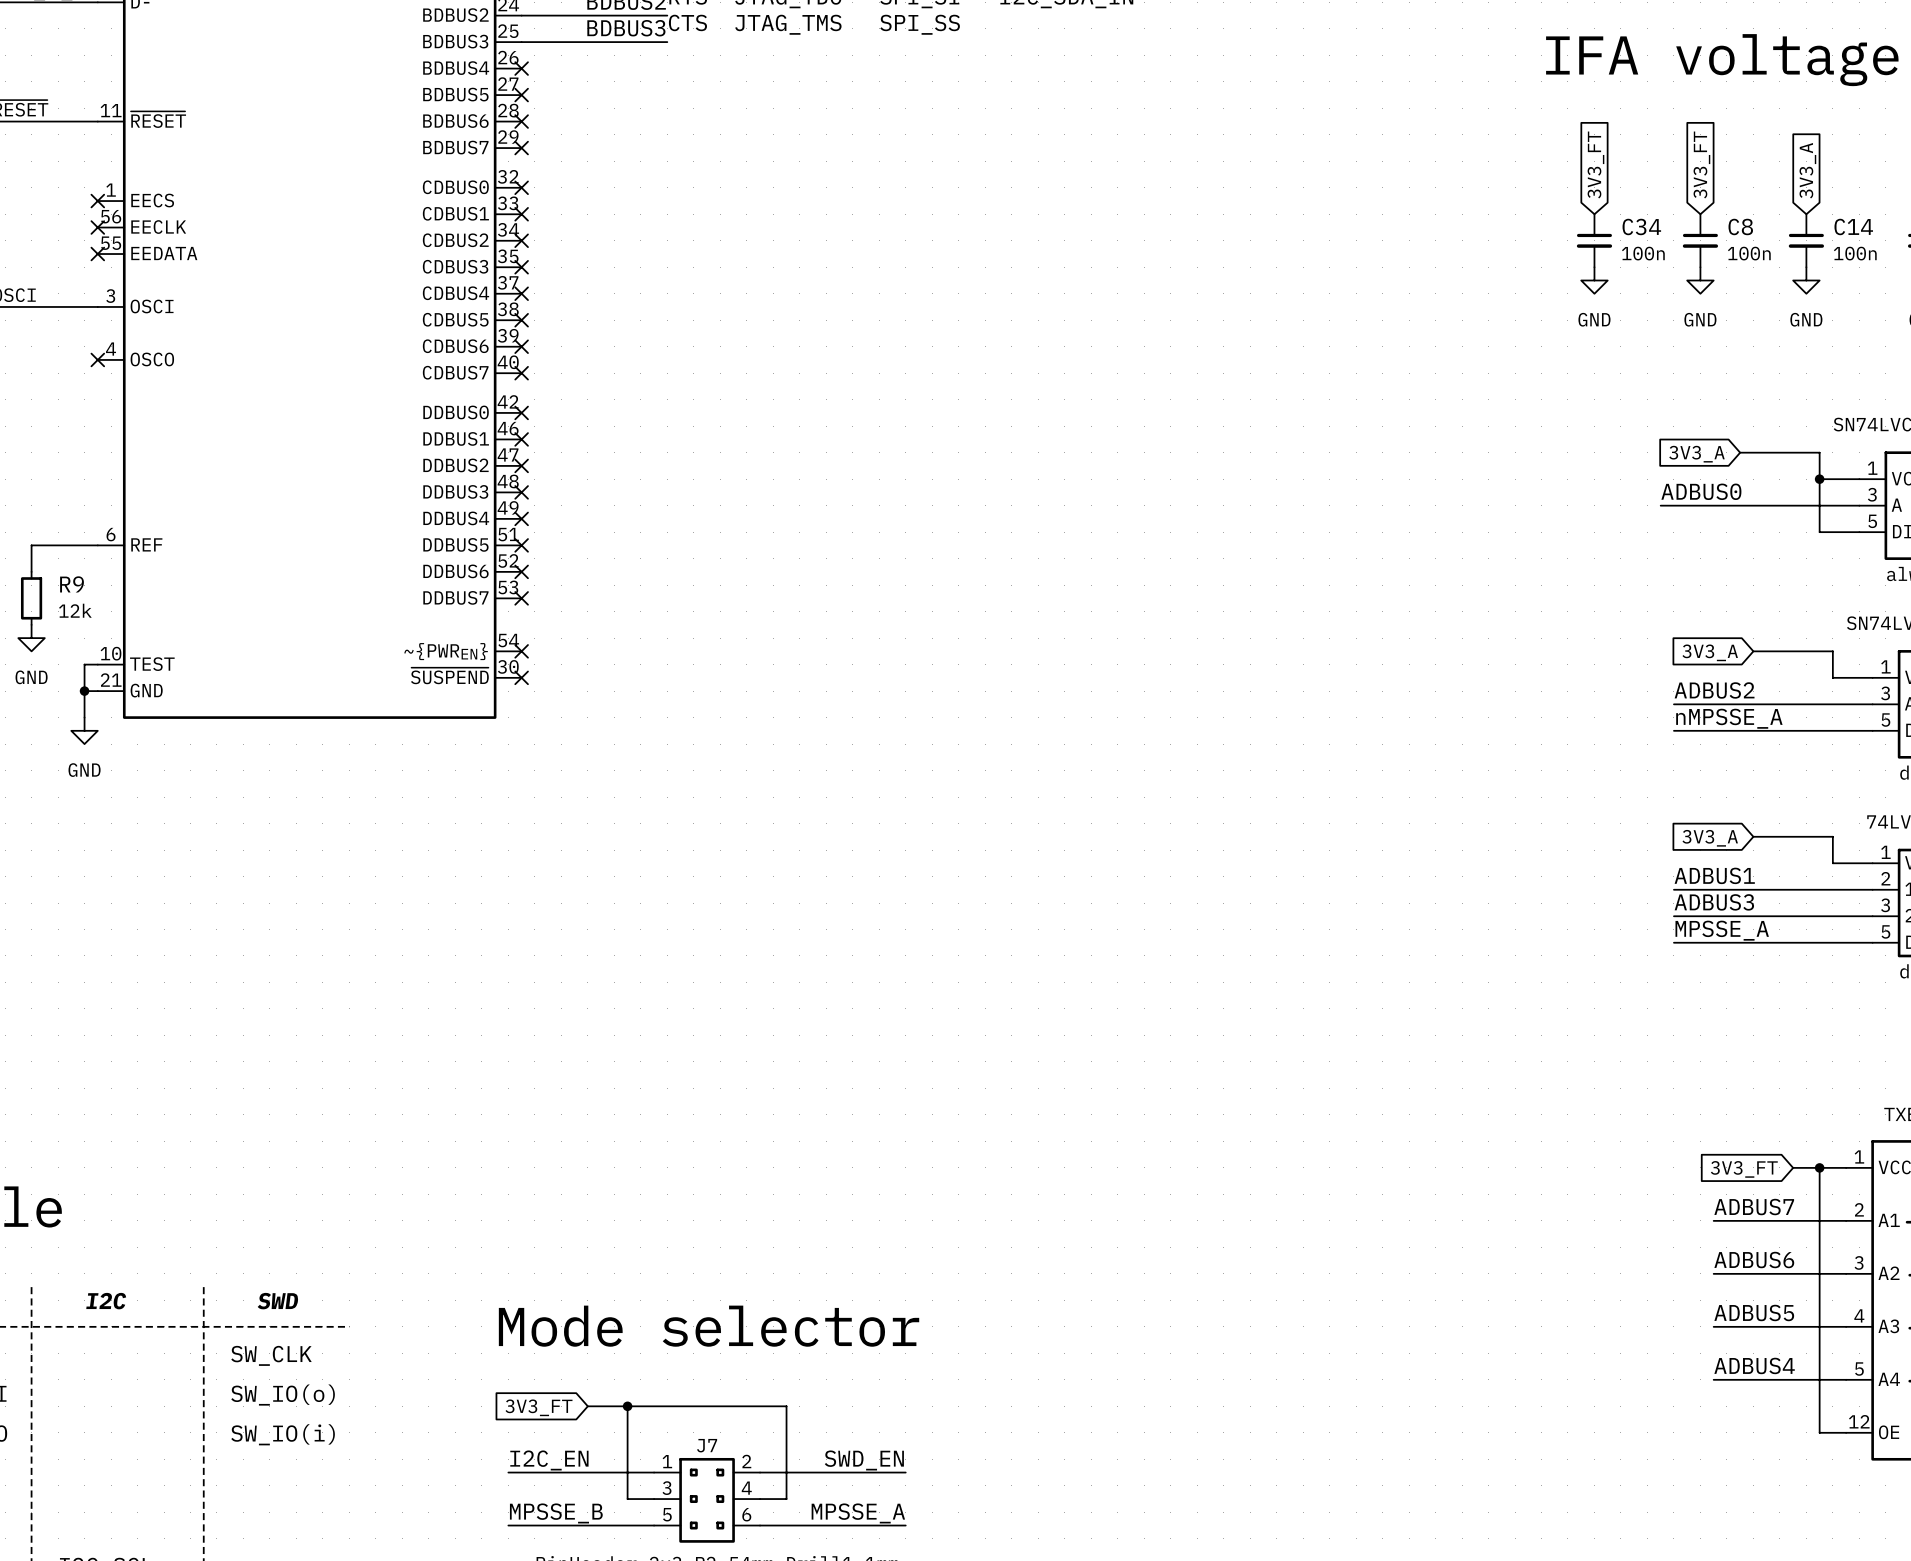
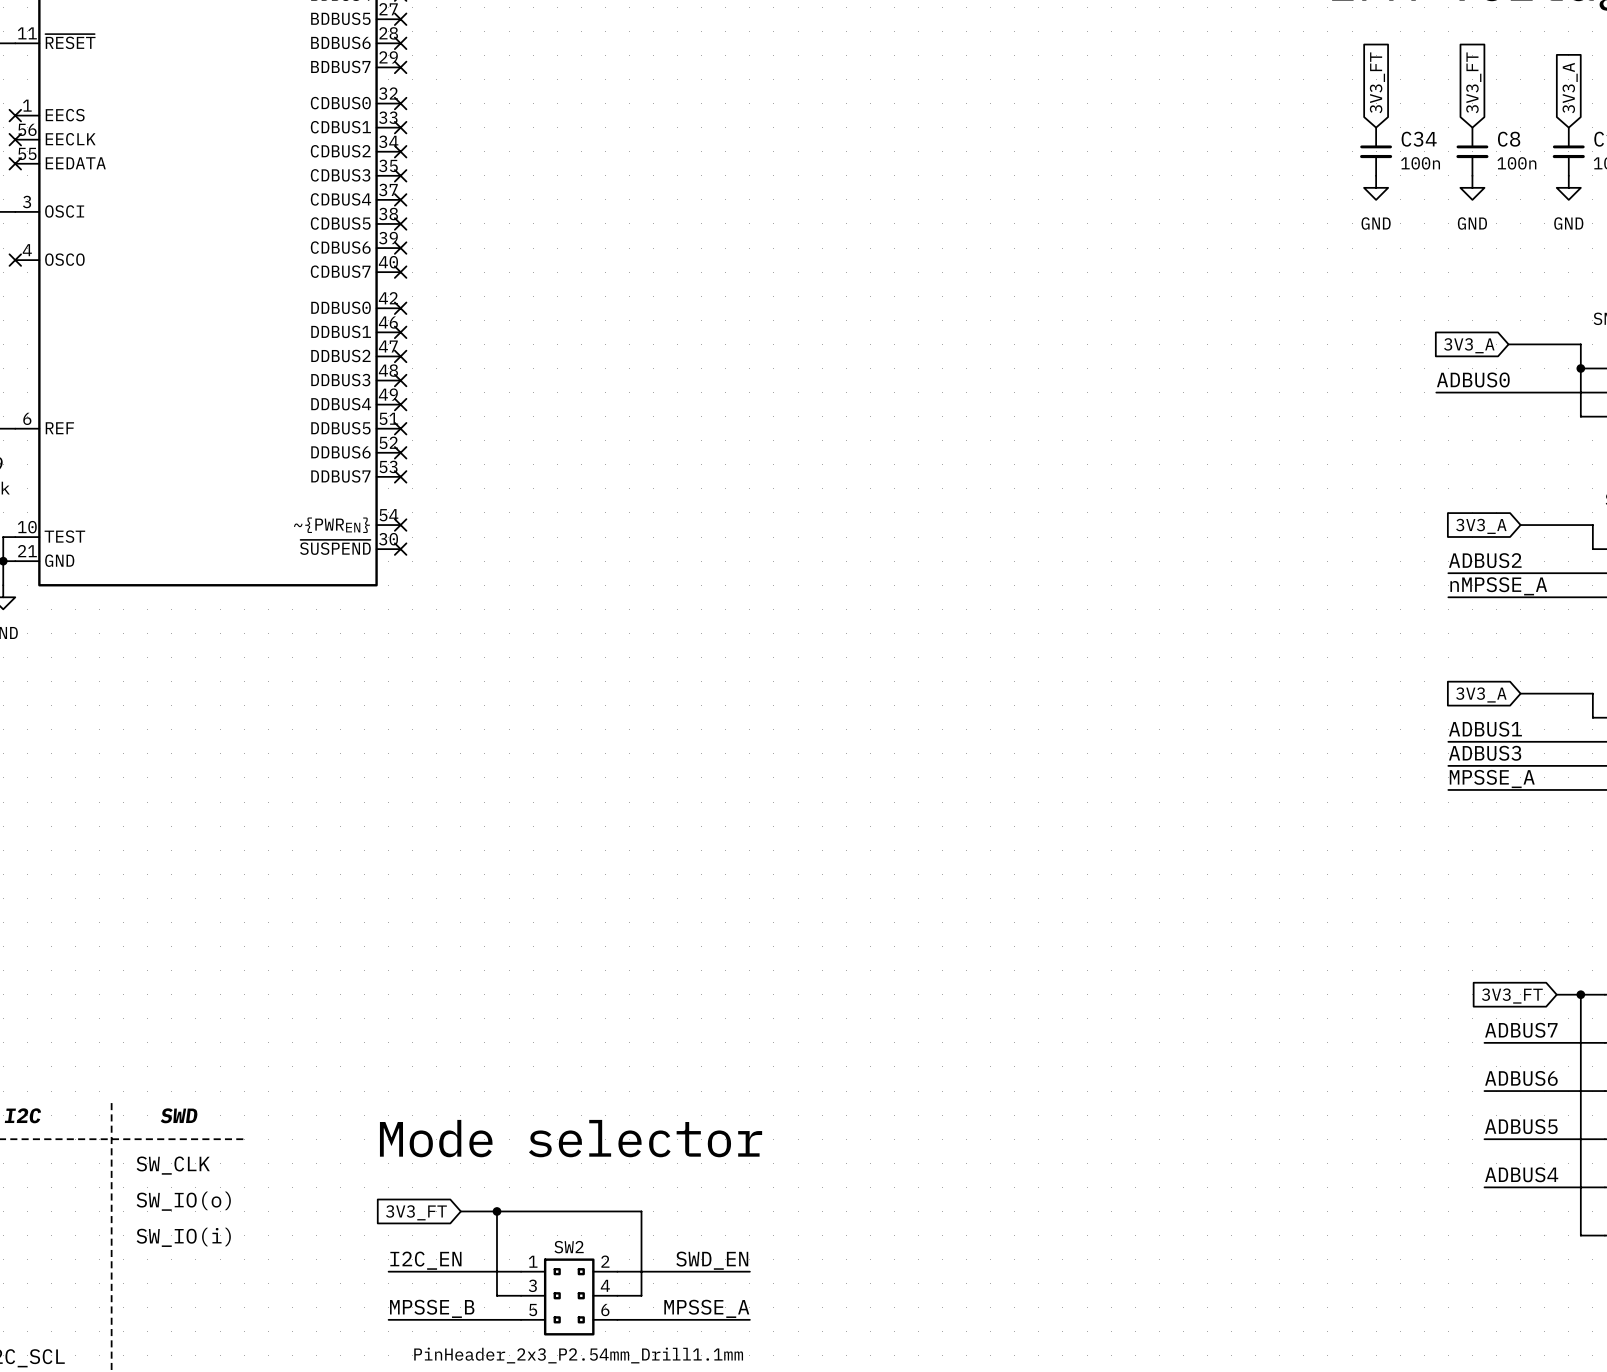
J7 name: J7 (707, 1445) -> SW2 (569, 1247)

